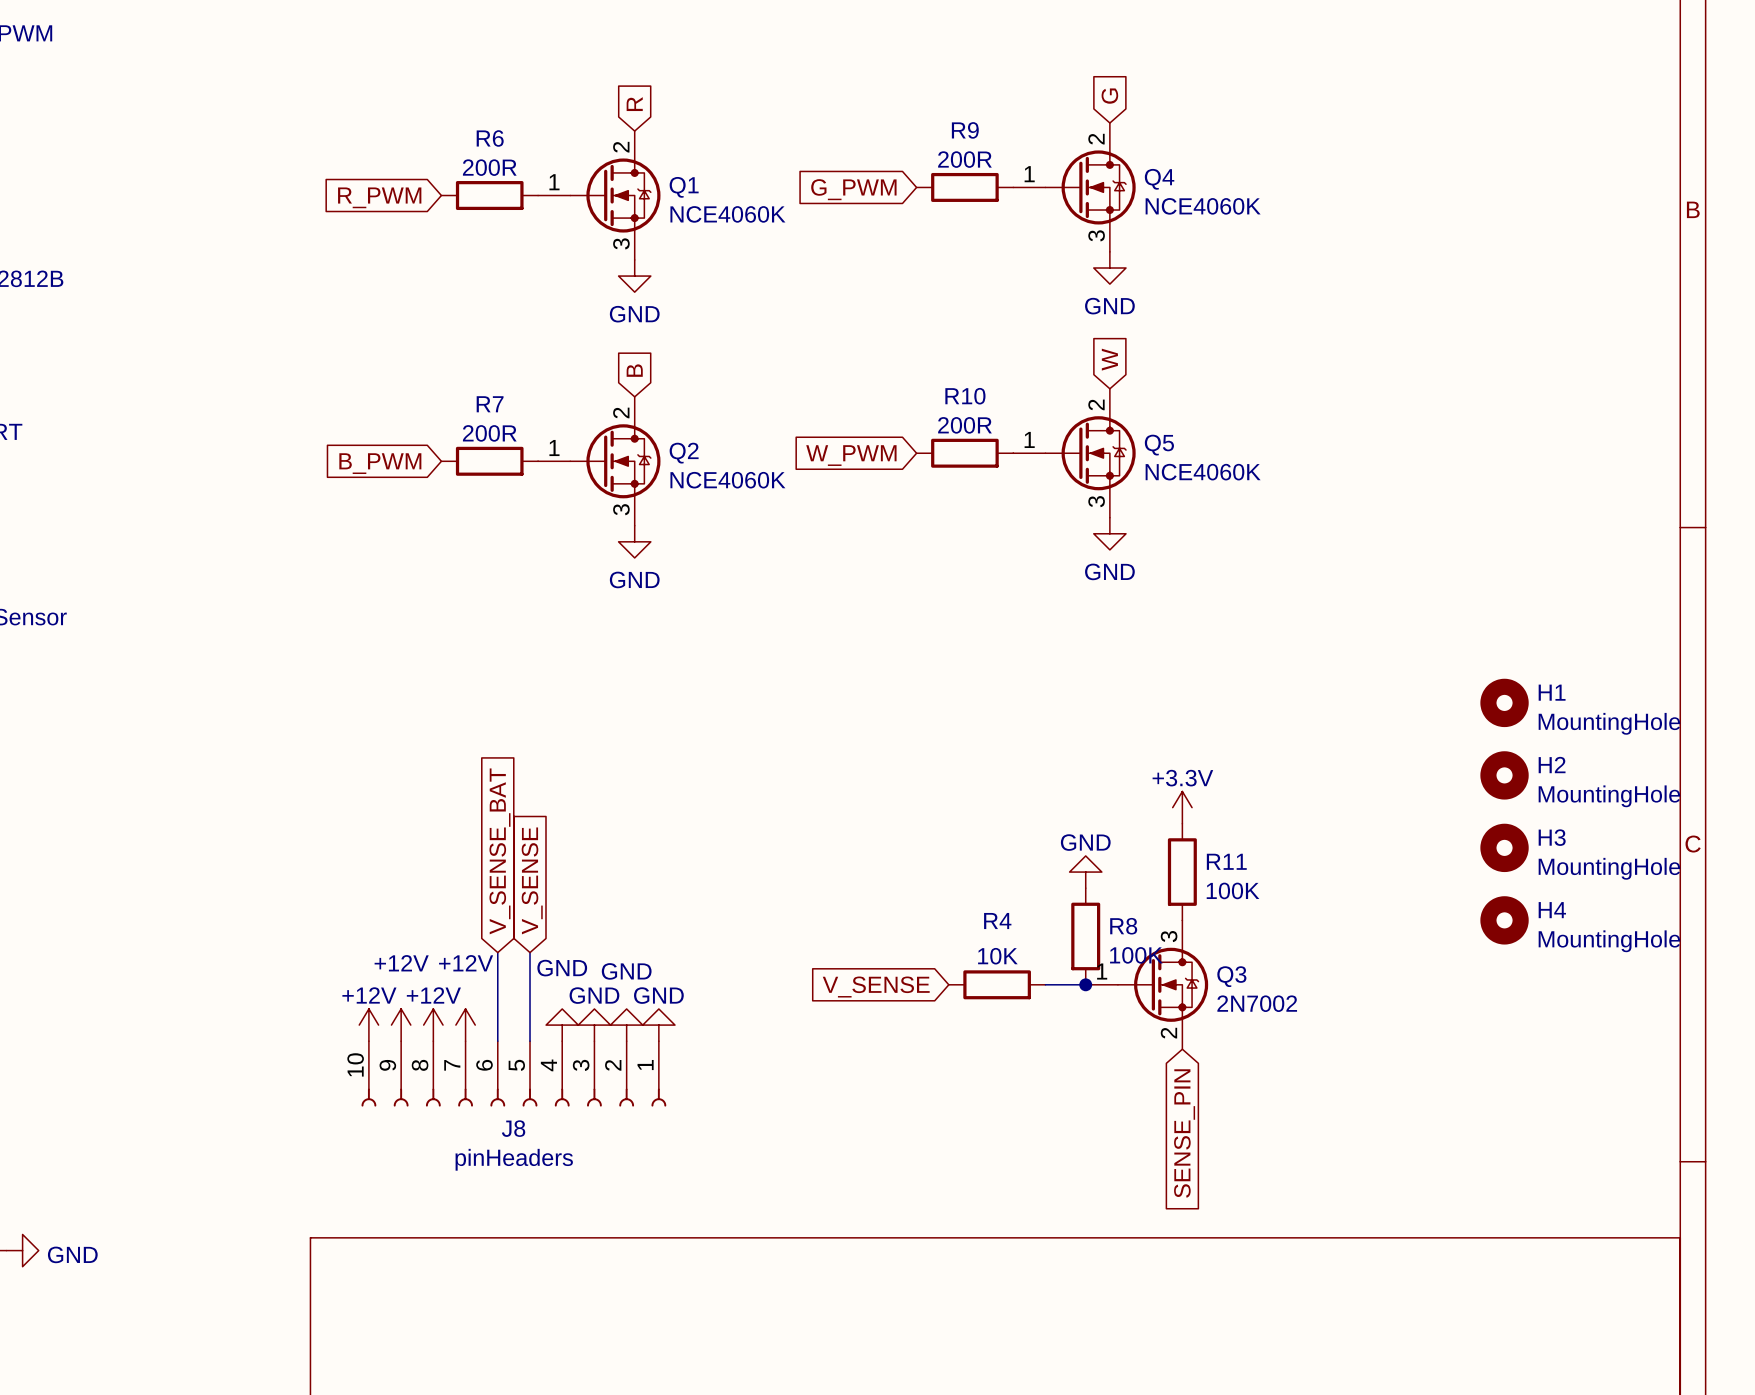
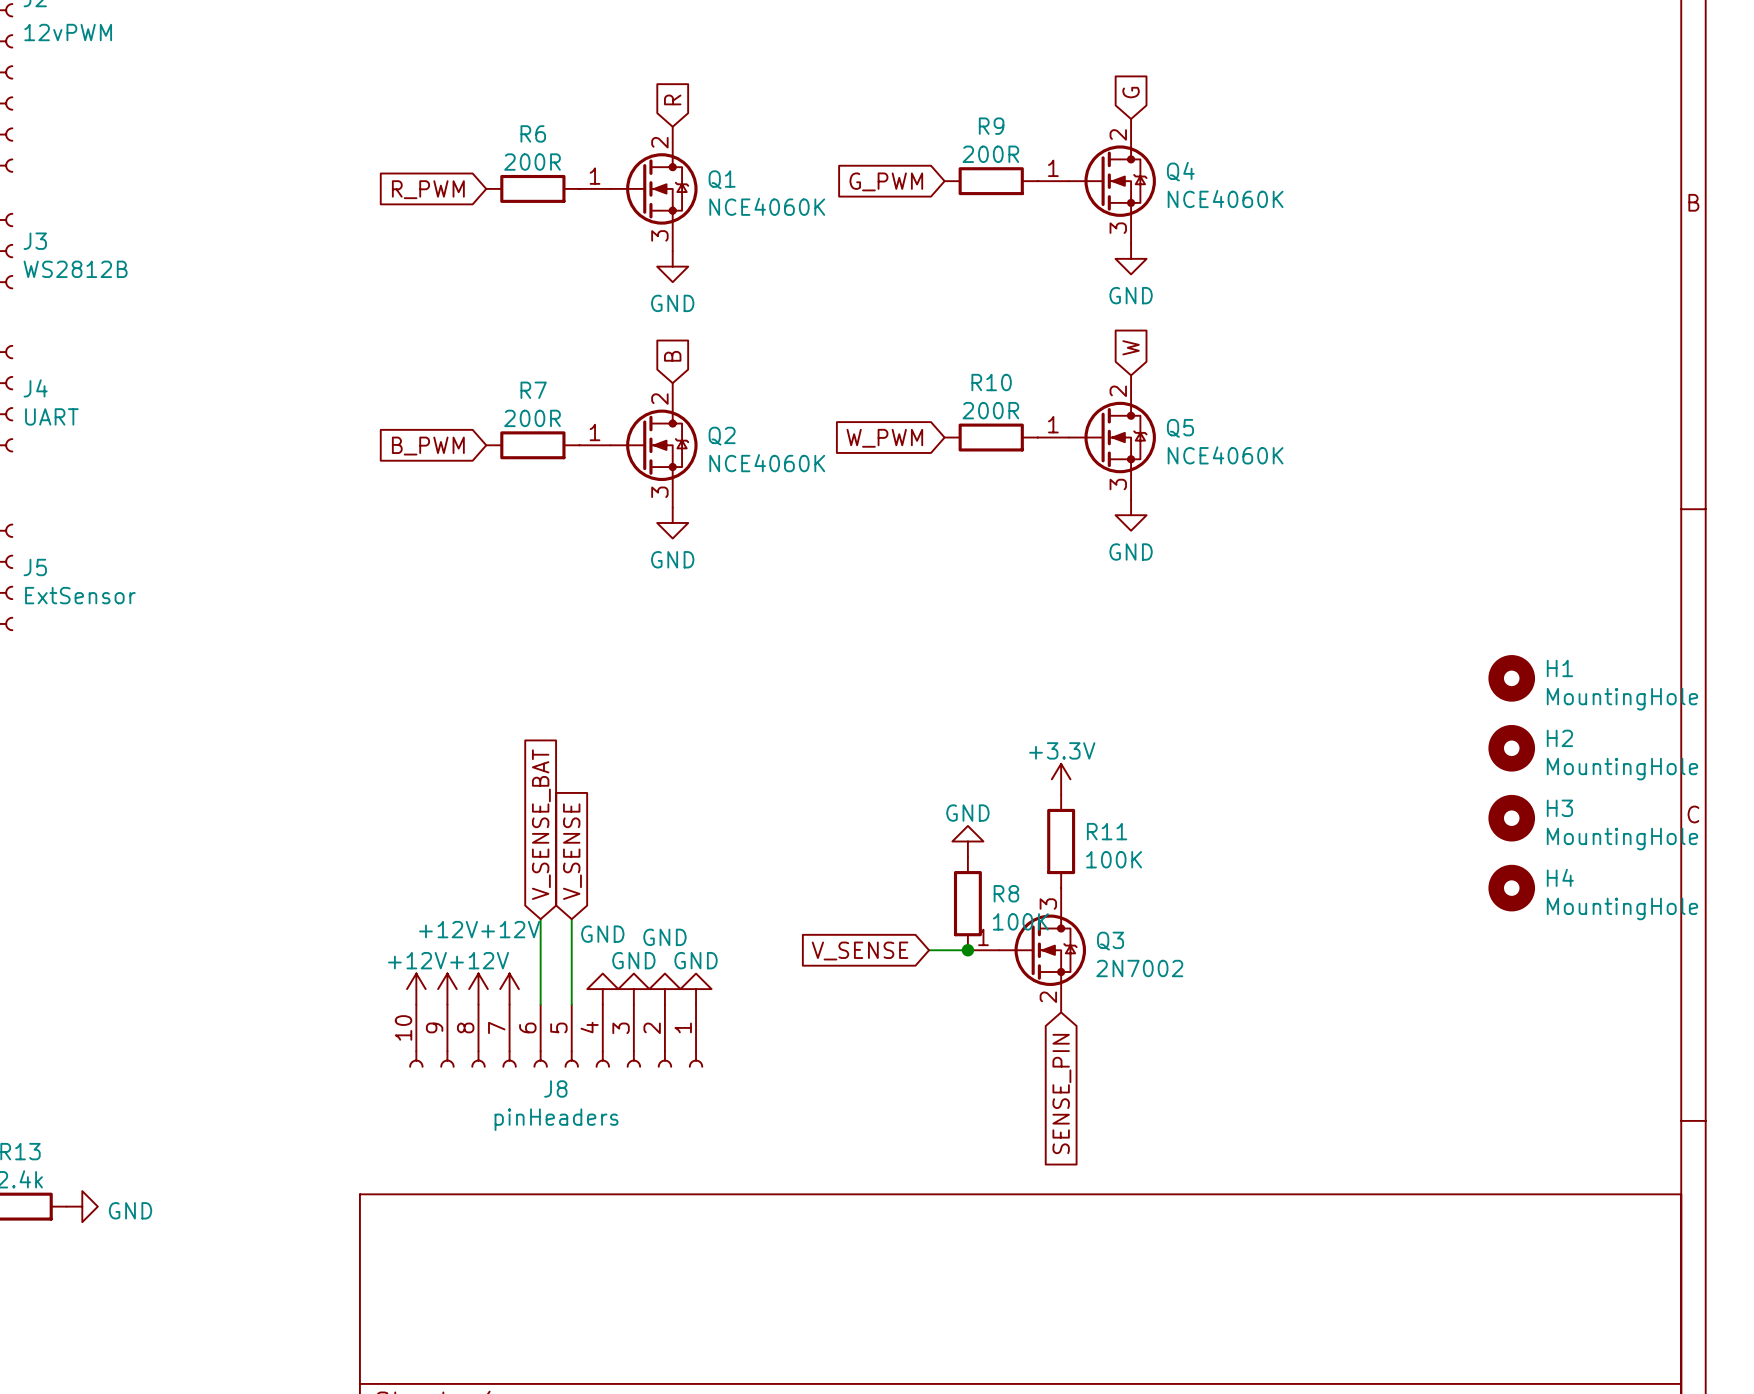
power symbol position: +3.3V (1182, 807) -> +3.3V (1061, 779)
power symbol position: GND (1085, 872) -> GND (967, 841)
R11 position: (1182, 872) -> (1061, 841)
R8 position: (1085, 936) -> (967, 903)
junction: none -> (967, 950)
R4: 10K (997, 984) -> none
wire: (1045, 984) (1085, 984) -> (929, 950) (967, 950)
junction: (1085, 984) -> none
Q3 position: (1146, 984) -> (1026, 950)
global label position: V_SENSE (876, 987) -> V_SENSE (860, 951)
global label position: SENSE_PIN (1184, 1133) -> SENSE_PIN (1061, 1094)

